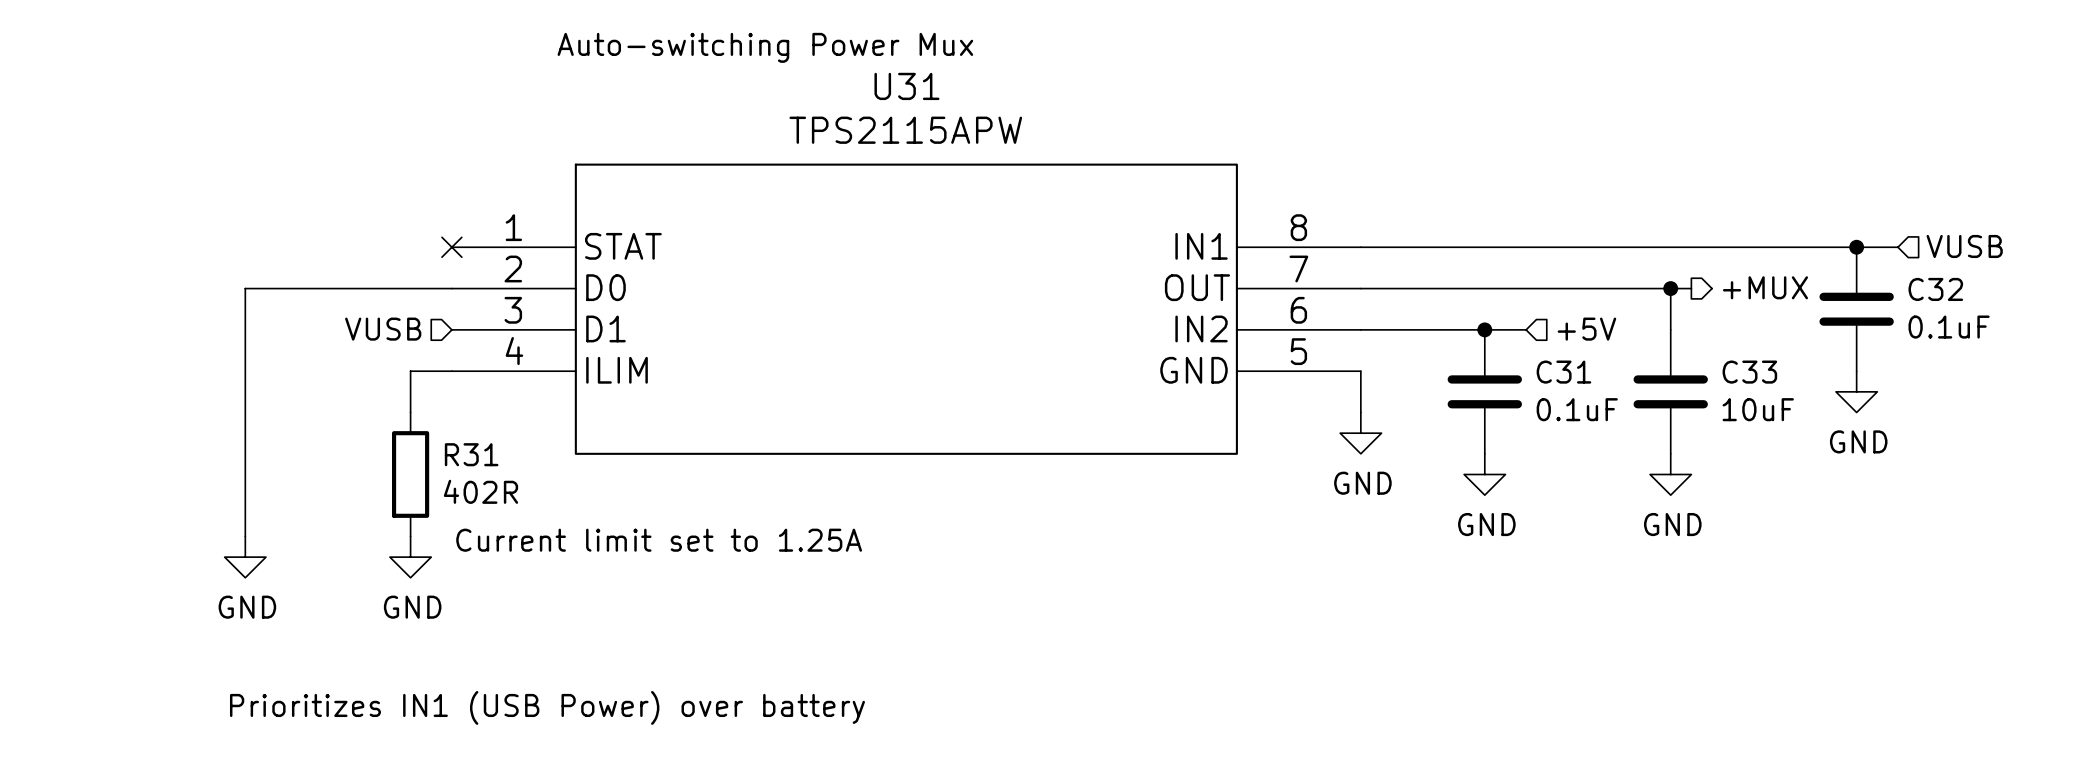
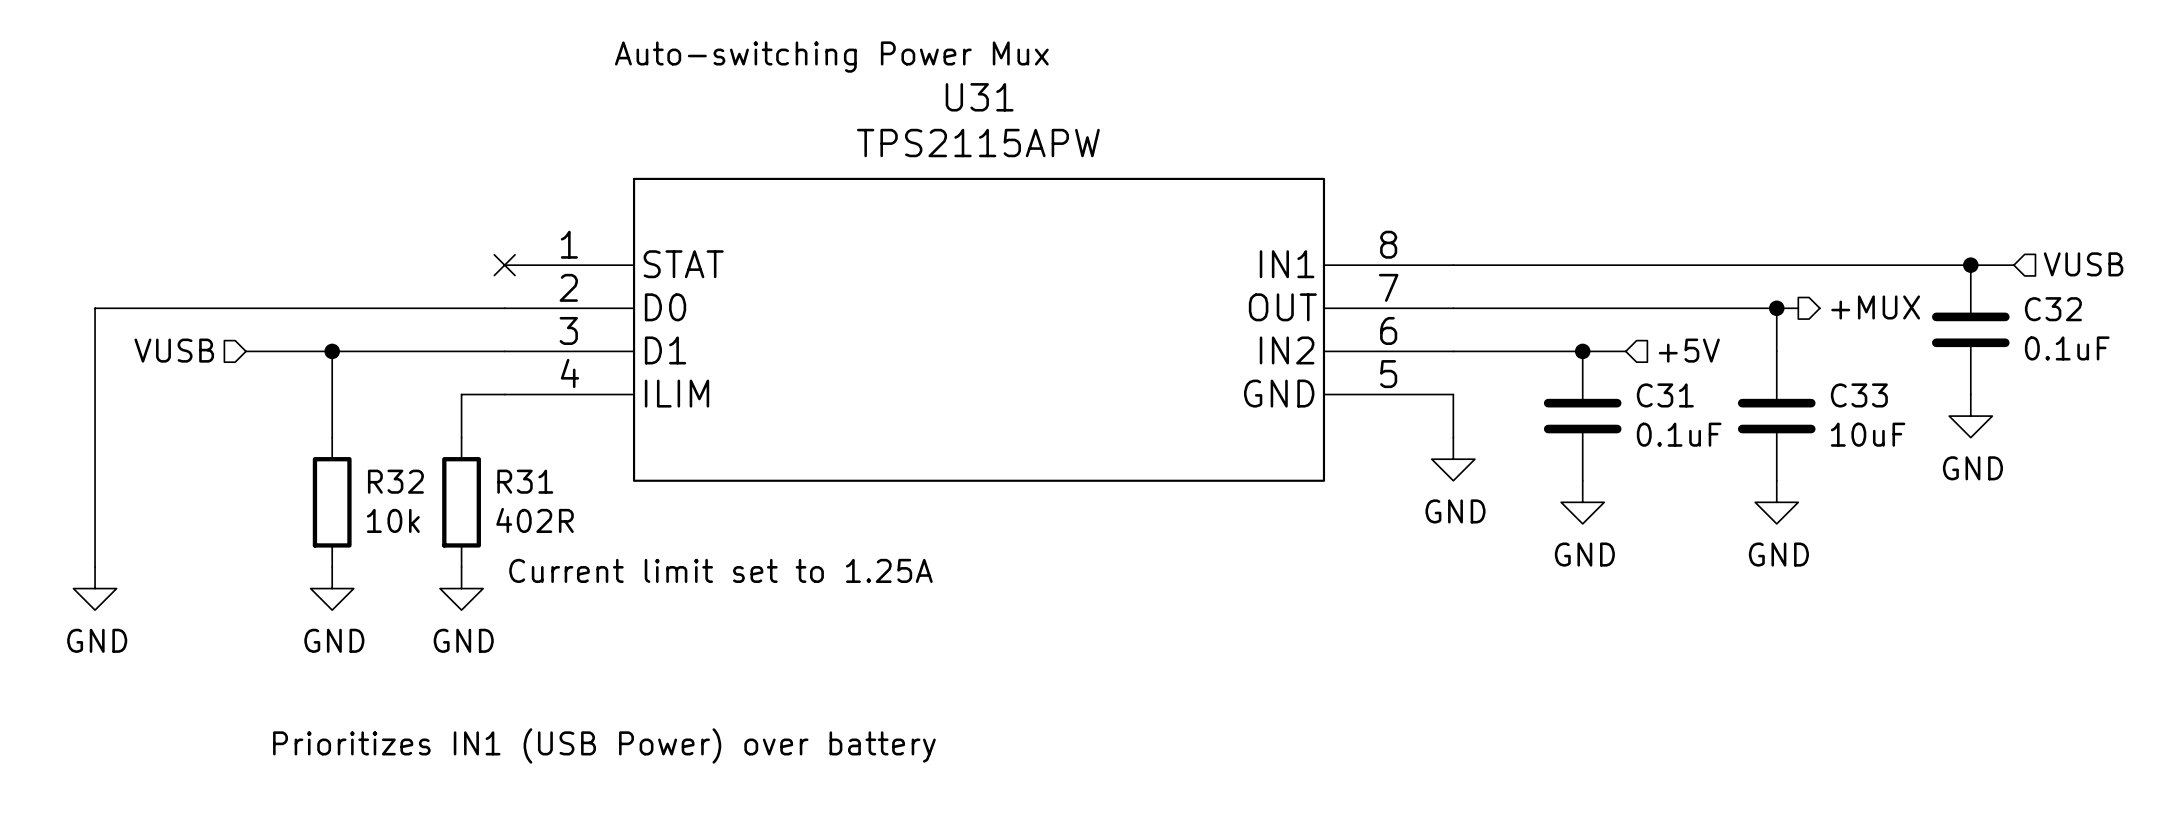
wire: (245, 288) (245, 536) -> (289, 308) (95, 308) (95, 567)
wire: none -> (245, 351) (504, 351)
wire: none -> (332, 351) (332, 437)
junction: none -> (332, 351)
hierarchical label position: VUSB (383, 329) -> VUSB (174, 350)
R32: none -> 10k (332, 502)
power symbol: none -> GND (95, 588)
power symbol position: GND (245, 557) -> GND (332, 588)

